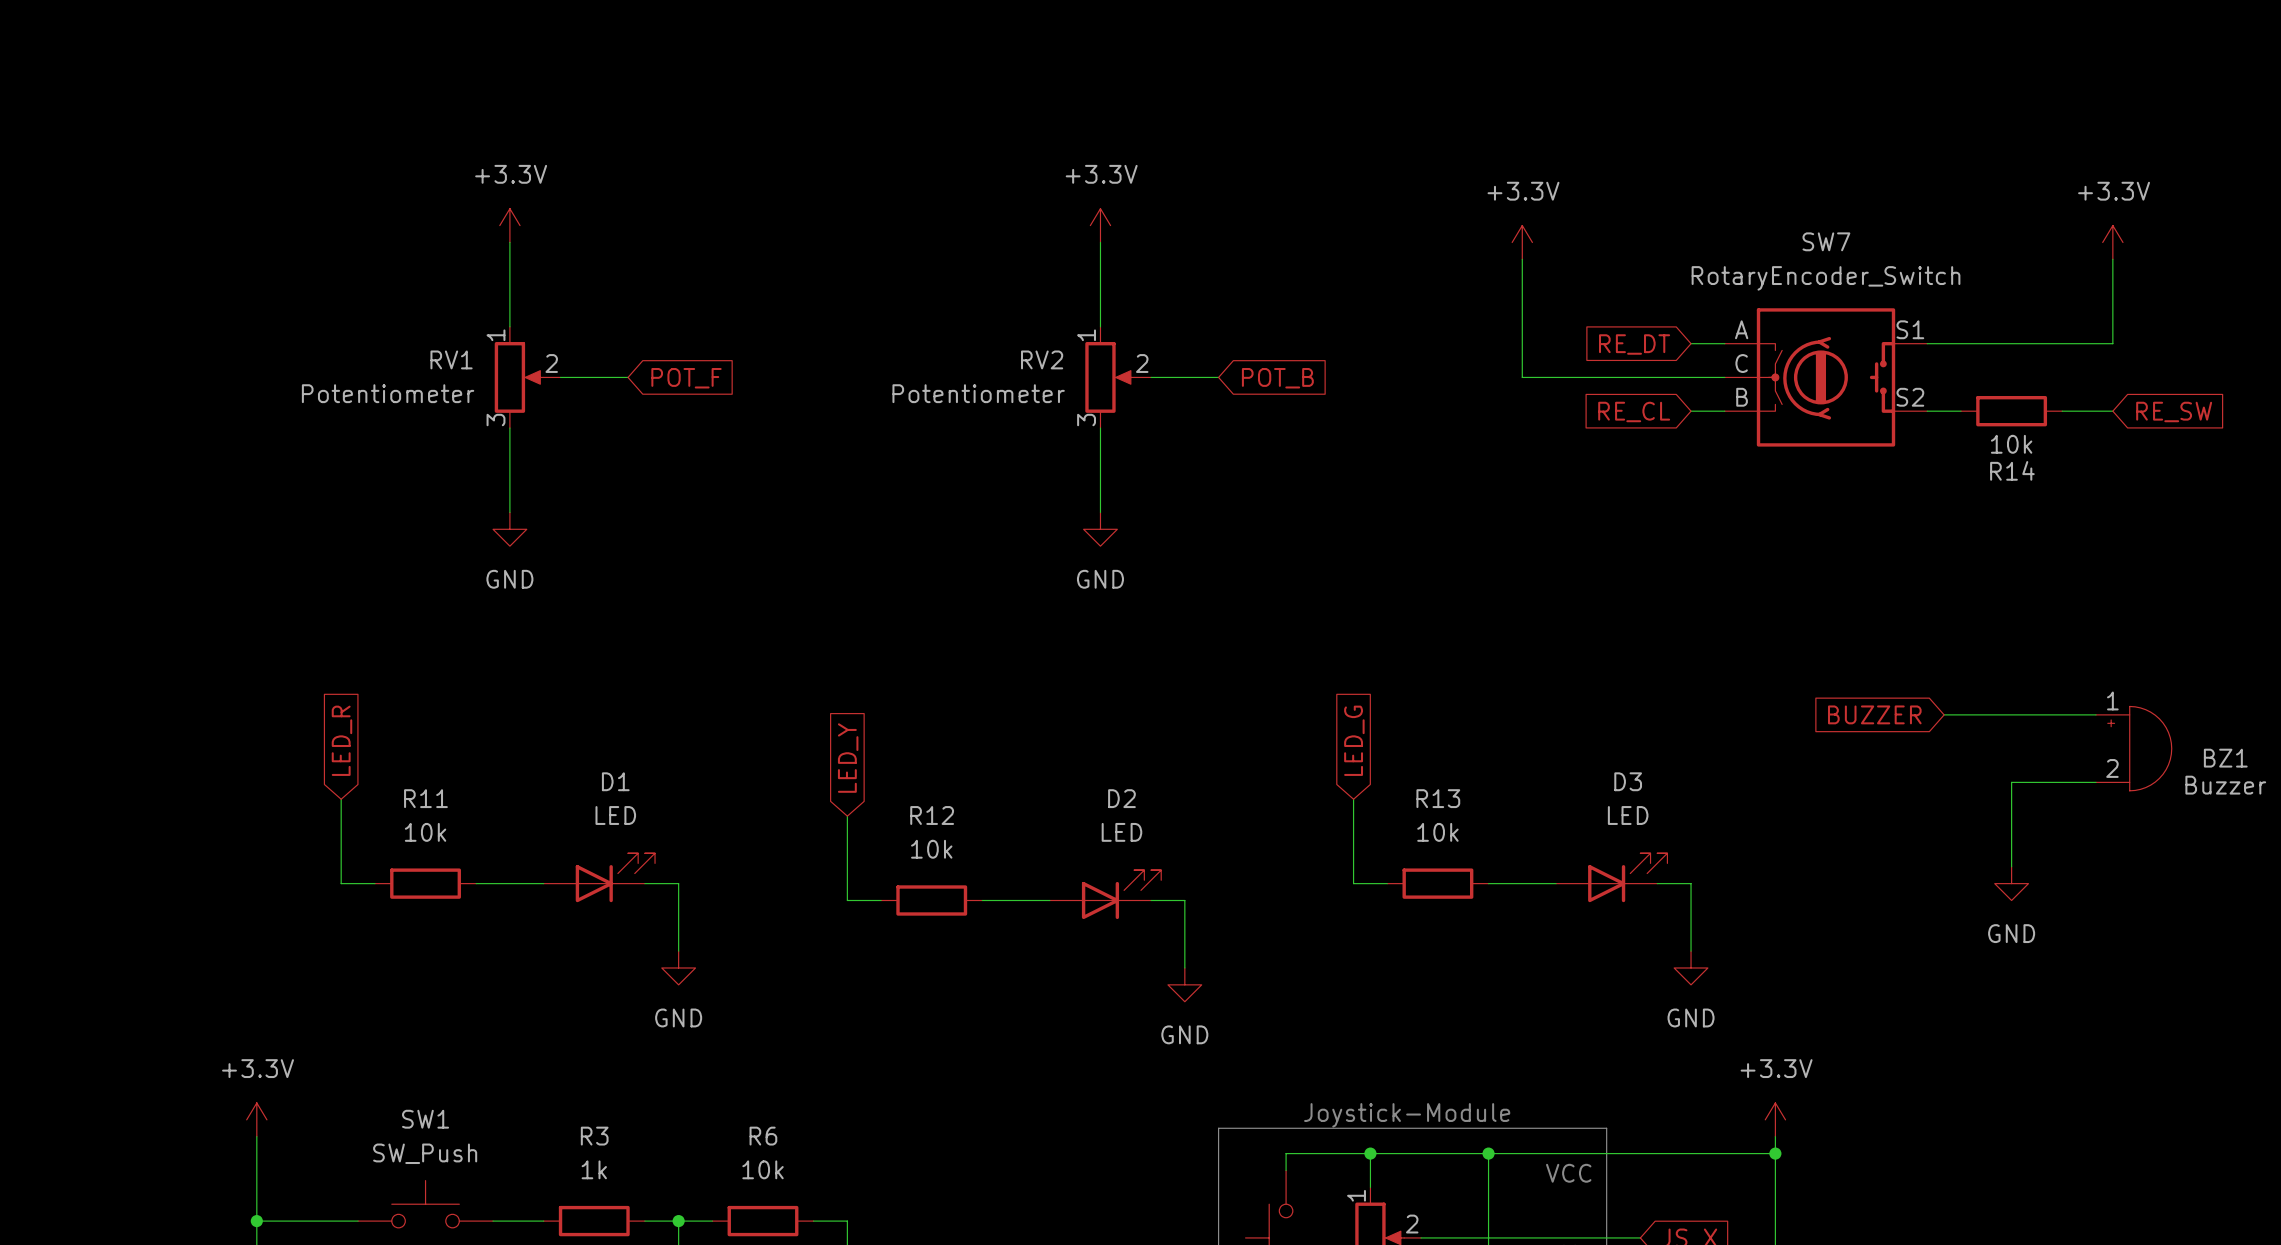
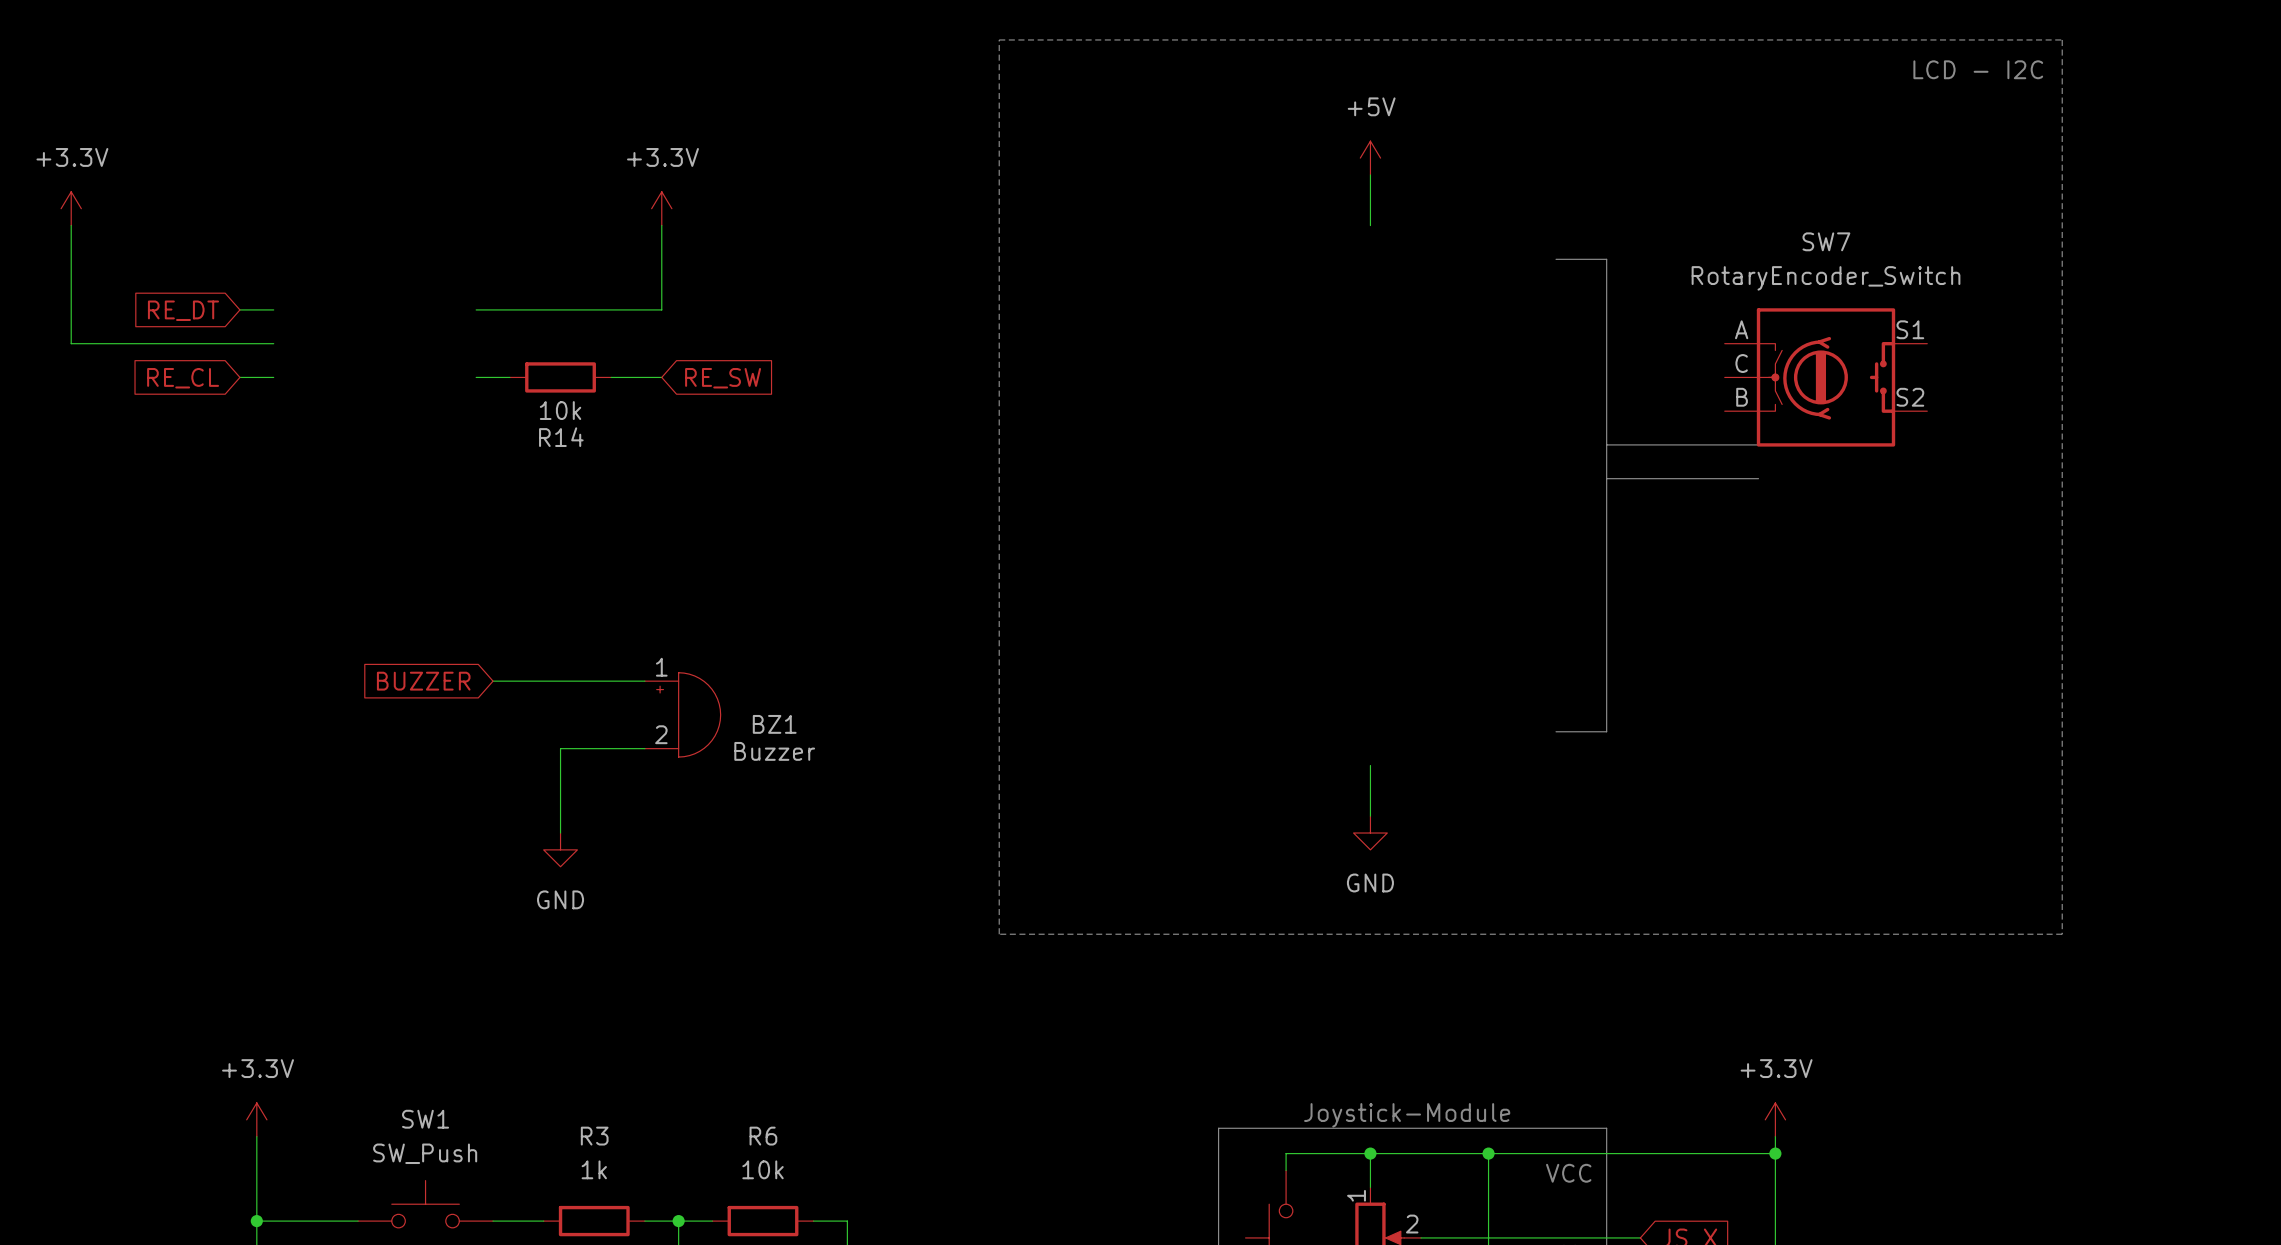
line: none -> (999, 39) (2062, 39) (2062, 934) (999, 934) (999, 39)
text: none -> LCD - I2C (1978, 69)
power symbol: none -> +5V (1370, 158)
wire: none -> (1370, 174) (1370, 225)
power symbol: none -> +3.3V (71, 208)
wire: none -> (71, 225) (71, 343) (273, 343)
power symbol position: +3.3V (509, 225) -> +3.3V (661, 208)
wire: none -> (661, 225) (661, 309) (476, 309)
power symbol: +3.3V (1100, 225) -> none
wire: (509, 242) (509, 326) -> none
wire: (1100, 242) (1100, 326) -> none
power symbol: +3.3V (1522, 242) -> none
power symbol: +3.3V (2112, 242) -> none
wire: (1522, 259) (1522, 377) (1724, 377) -> none
line: none -> (1556, 259) (1606, 259) (1606, 731) (1556, 731)
wire: (2112, 259) (2112, 343) (1927, 343) -> none
wire: none -> (239, 309) (273, 309)
global label: none -> RE_DT (183, 310)
wire: (1691, 343) (1724, 343) -> none
global label: RE_DT (1634, 344) -> none
wire: none -> (239, 377) (273, 377)
wire: none -> (476, 377) (509, 377)
RV1: Potentiometer (527, 377) -> none
wire: (560, 377) (611, 377) -> none
wire: none -> (628, 377) (661, 377)
RV2: Potentiometer (1118, 377) -> none
wire: (1151, 377) (1218, 377) -> none
global label: none -> RE_CL (183, 378)
global label: POT_F (686, 378) -> none
global label: none -> RE_SW (723, 378)
global label: POT_B (1277, 378) -> none
global label: RE_CL (1634, 411) -> none
wire: (1691, 411) (1724, 411) -> none
wire: (1927, 411) (1960, 411) -> none
R14 position: (2011, 411) -> (560, 377)
wire: (2062, 411) (2112, 411) -> none
global label: RE_SW (2174, 411) -> none
wire: (509, 428) (509, 512) -> none
wire: (1100, 428) (1100, 512) -> none
line: none -> (1606, 444) (1758, 444)
line: none -> (1606, 478) (1758, 478)
power symbol: GND (509, 529) -> none
power symbol: GND (1100, 529) -> none
global label: none -> BUZZER (423, 681)
wire: none -> (493, 681) (644, 681)
global label: BUZZER (1874, 714) -> none
wire: (1944, 714) (2095, 714) -> none
global label: LED_R (341, 740) -> none
global label: LED_G (1354, 740) -> none
wire: none -> (644, 748) (560, 748) (560, 833)
BZ1 position: (2133, 748) -> (682, 714)
global label: LED_Y (848, 758) -> none
wire: none -> (1370, 765) (1370, 816)
wire: (2095, 782) (2011, 782) (2011, 866) -> none
wire: (341, 799) (341, 883) (374, 883) -> none
wire: (1353, 799) (1353, 883) (1387, 883) -> none
wire: (847, 816) (847, 900) (881, 900) -> none
power symbol: none -> GND (1370, 833)
power symbol: none -> GND (560, 849)
D1: LED (599, 877) -> none
D3: LED (1611, 877) -> none
R11: 10k (425, 883) -> none
wire: (476, 883) (543, 883) -> none
wire: (644, 883) (678, 883) (678, 951) -> none
R13: 10k (1437, 883) -> none
wire: (1488, 883) (1556, 883) -> none
wire: (1657, 883) (1691, 883) (1691, 951) -> none
power symbol: GND (2011, 883) -> none
D2: LED (1105, 894) -> none
R12: 10k (931, 900) -> none
wire: (982, 900) (1049, 900) -> none
wire: (1151, 900) (1184, 900) (1184, 967) -> none
power symbol: GND (678, 967) -> none
power symbol: GND (1691, 967) -> none
power symbol: GND (1184, 984) -> none

